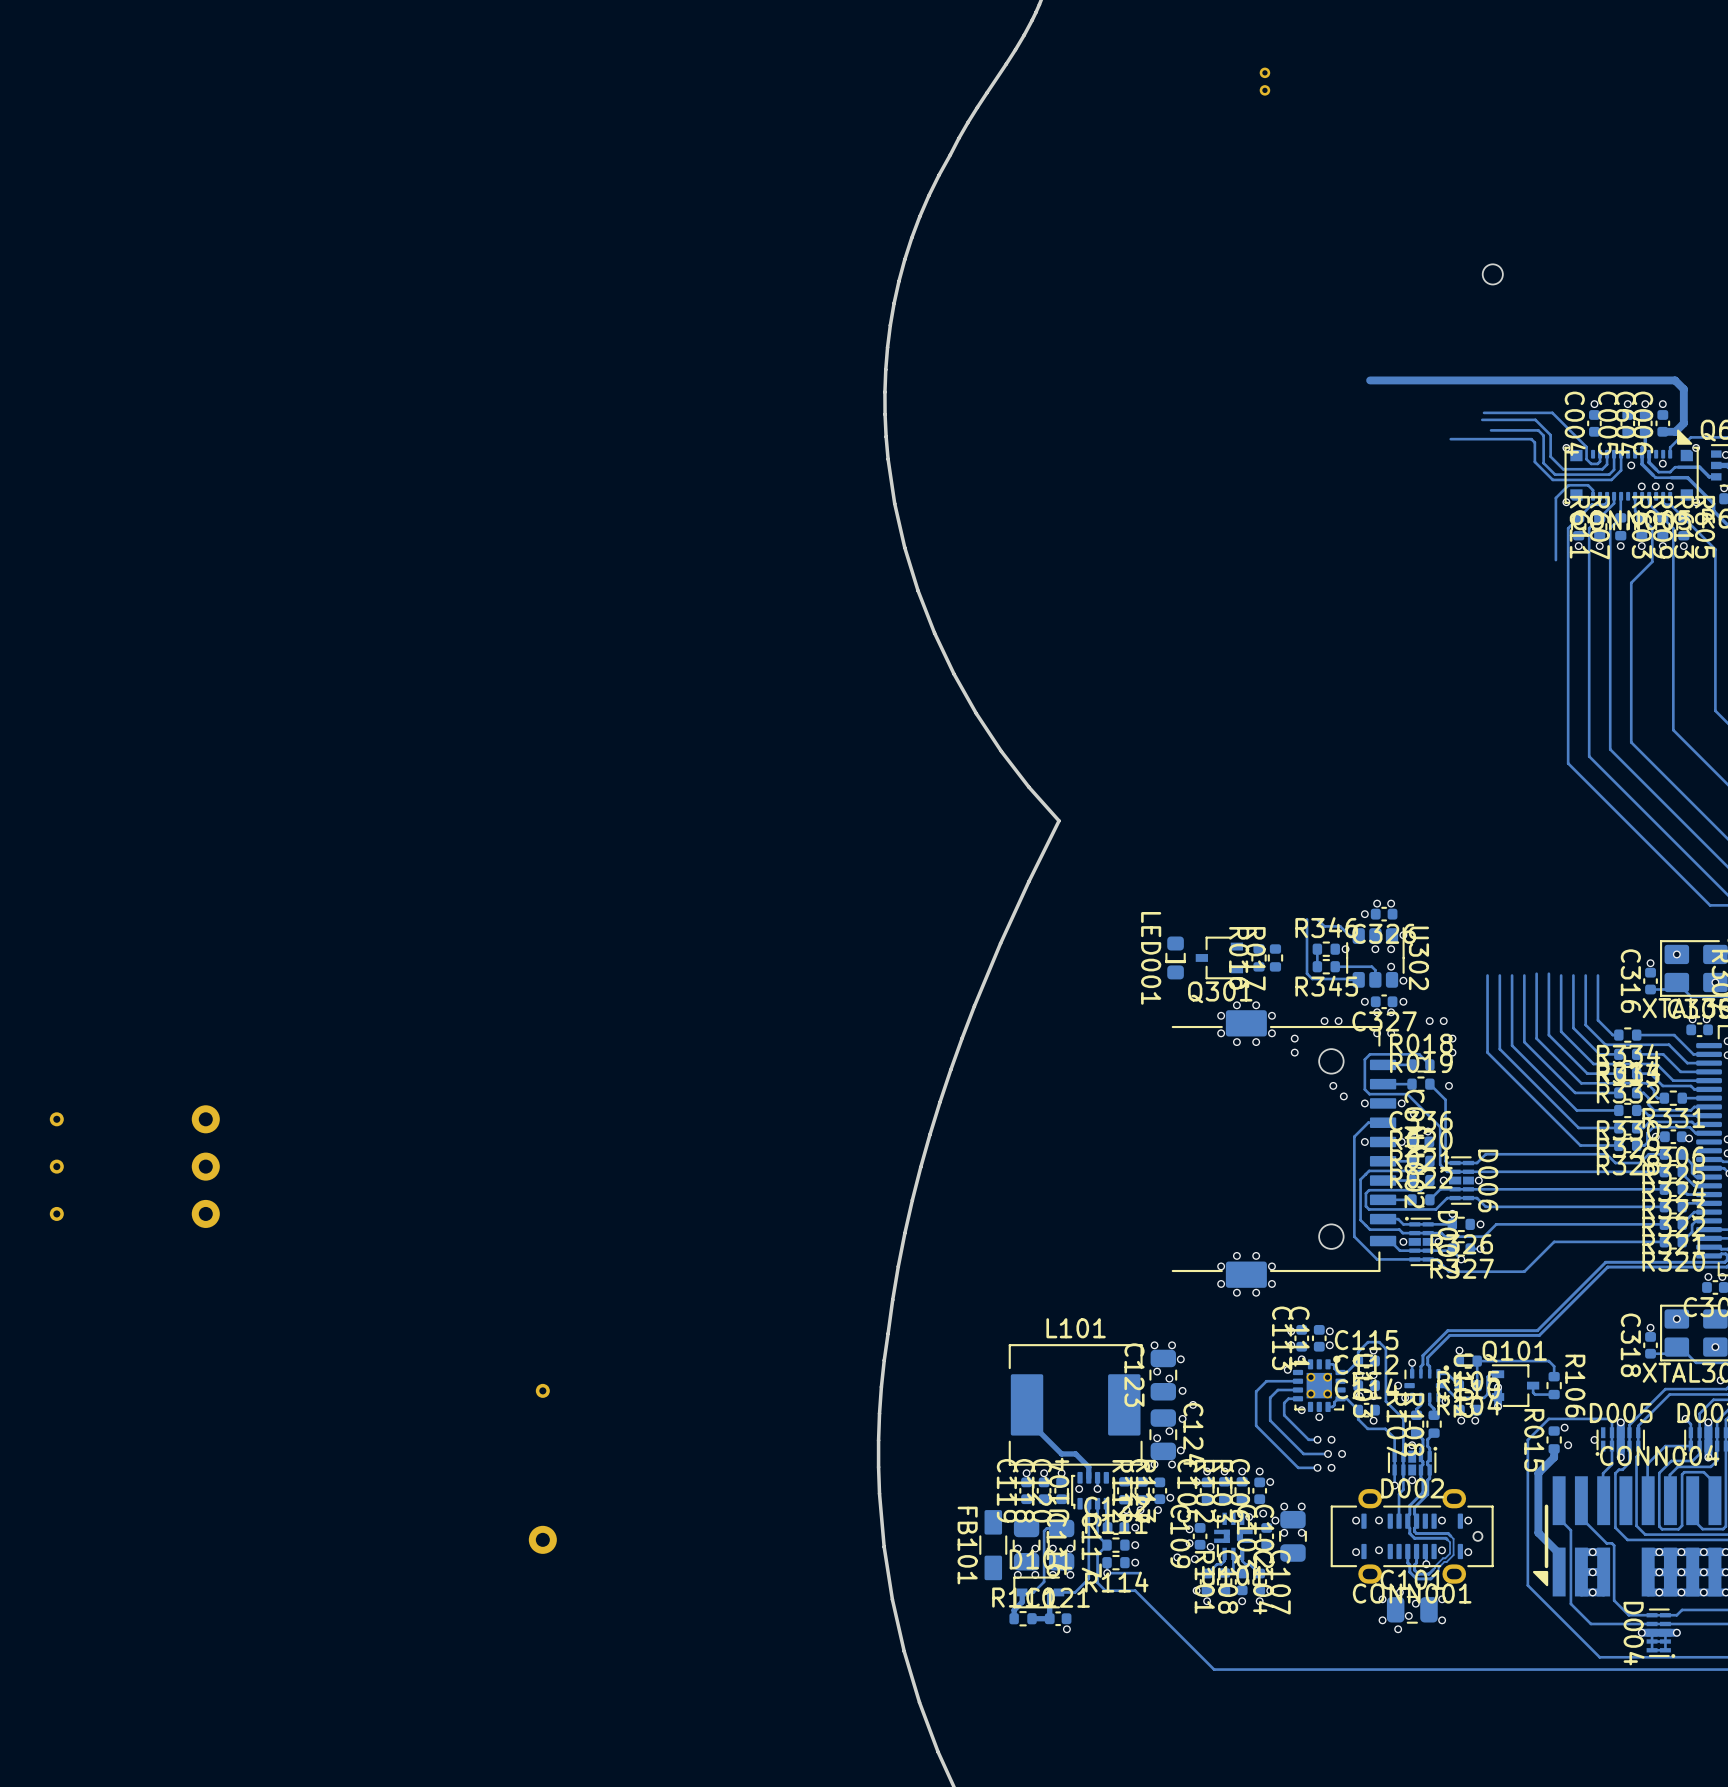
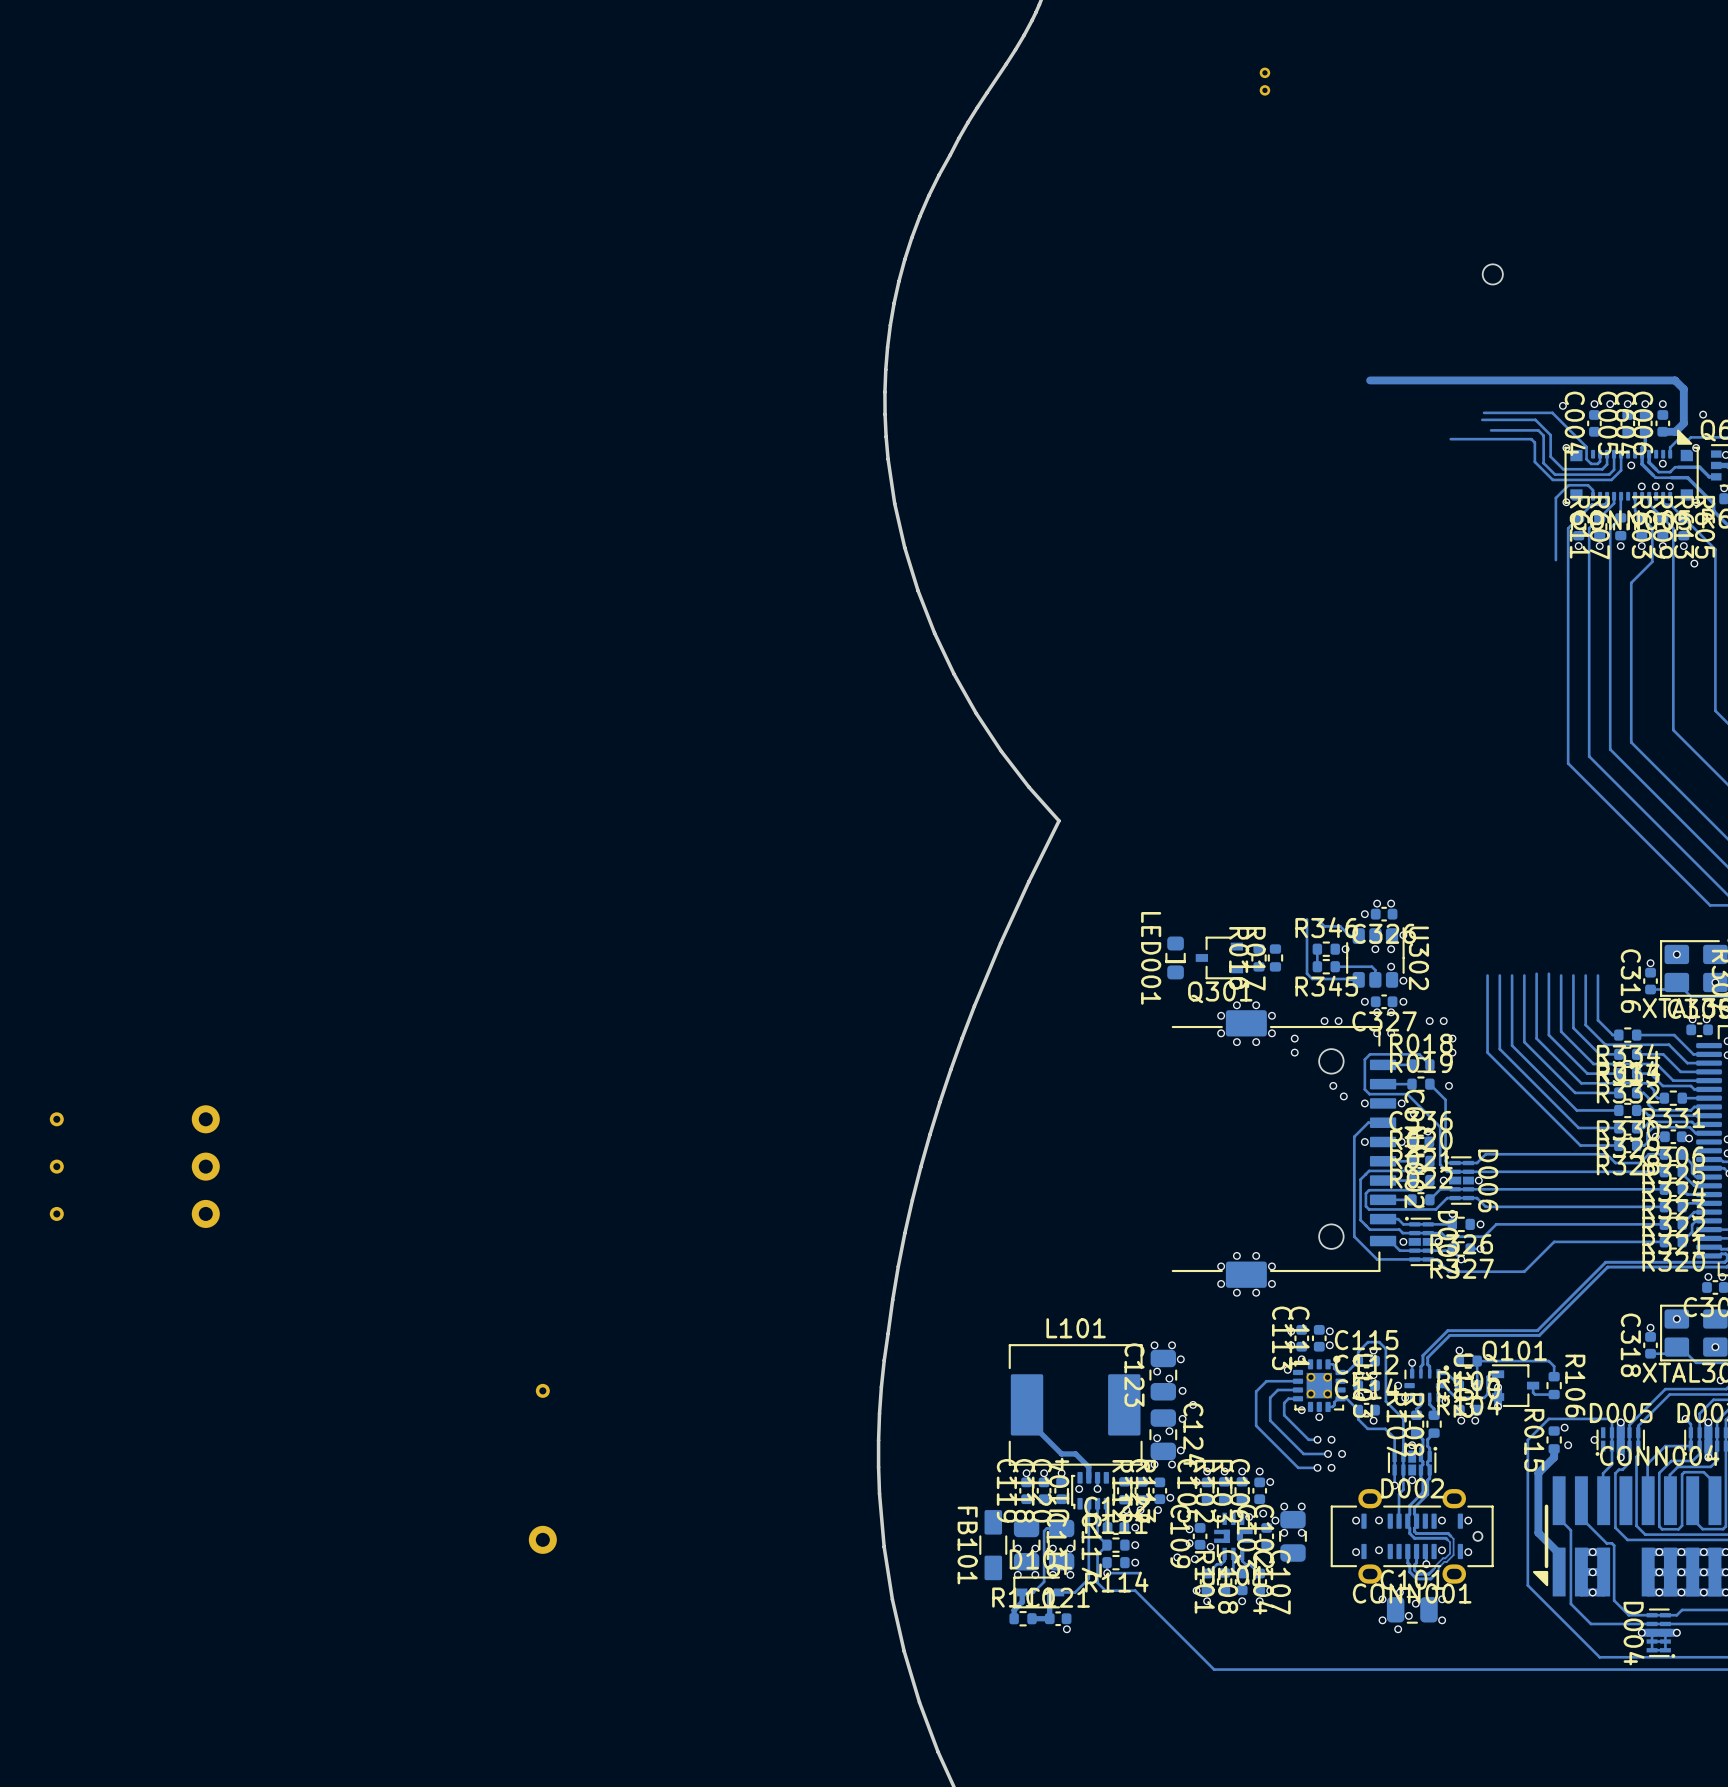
via: none -> (1610, 404)
via: none -> (1562, 405)
via: none -> (1703, 414)
via: none -> (1694, 563)

